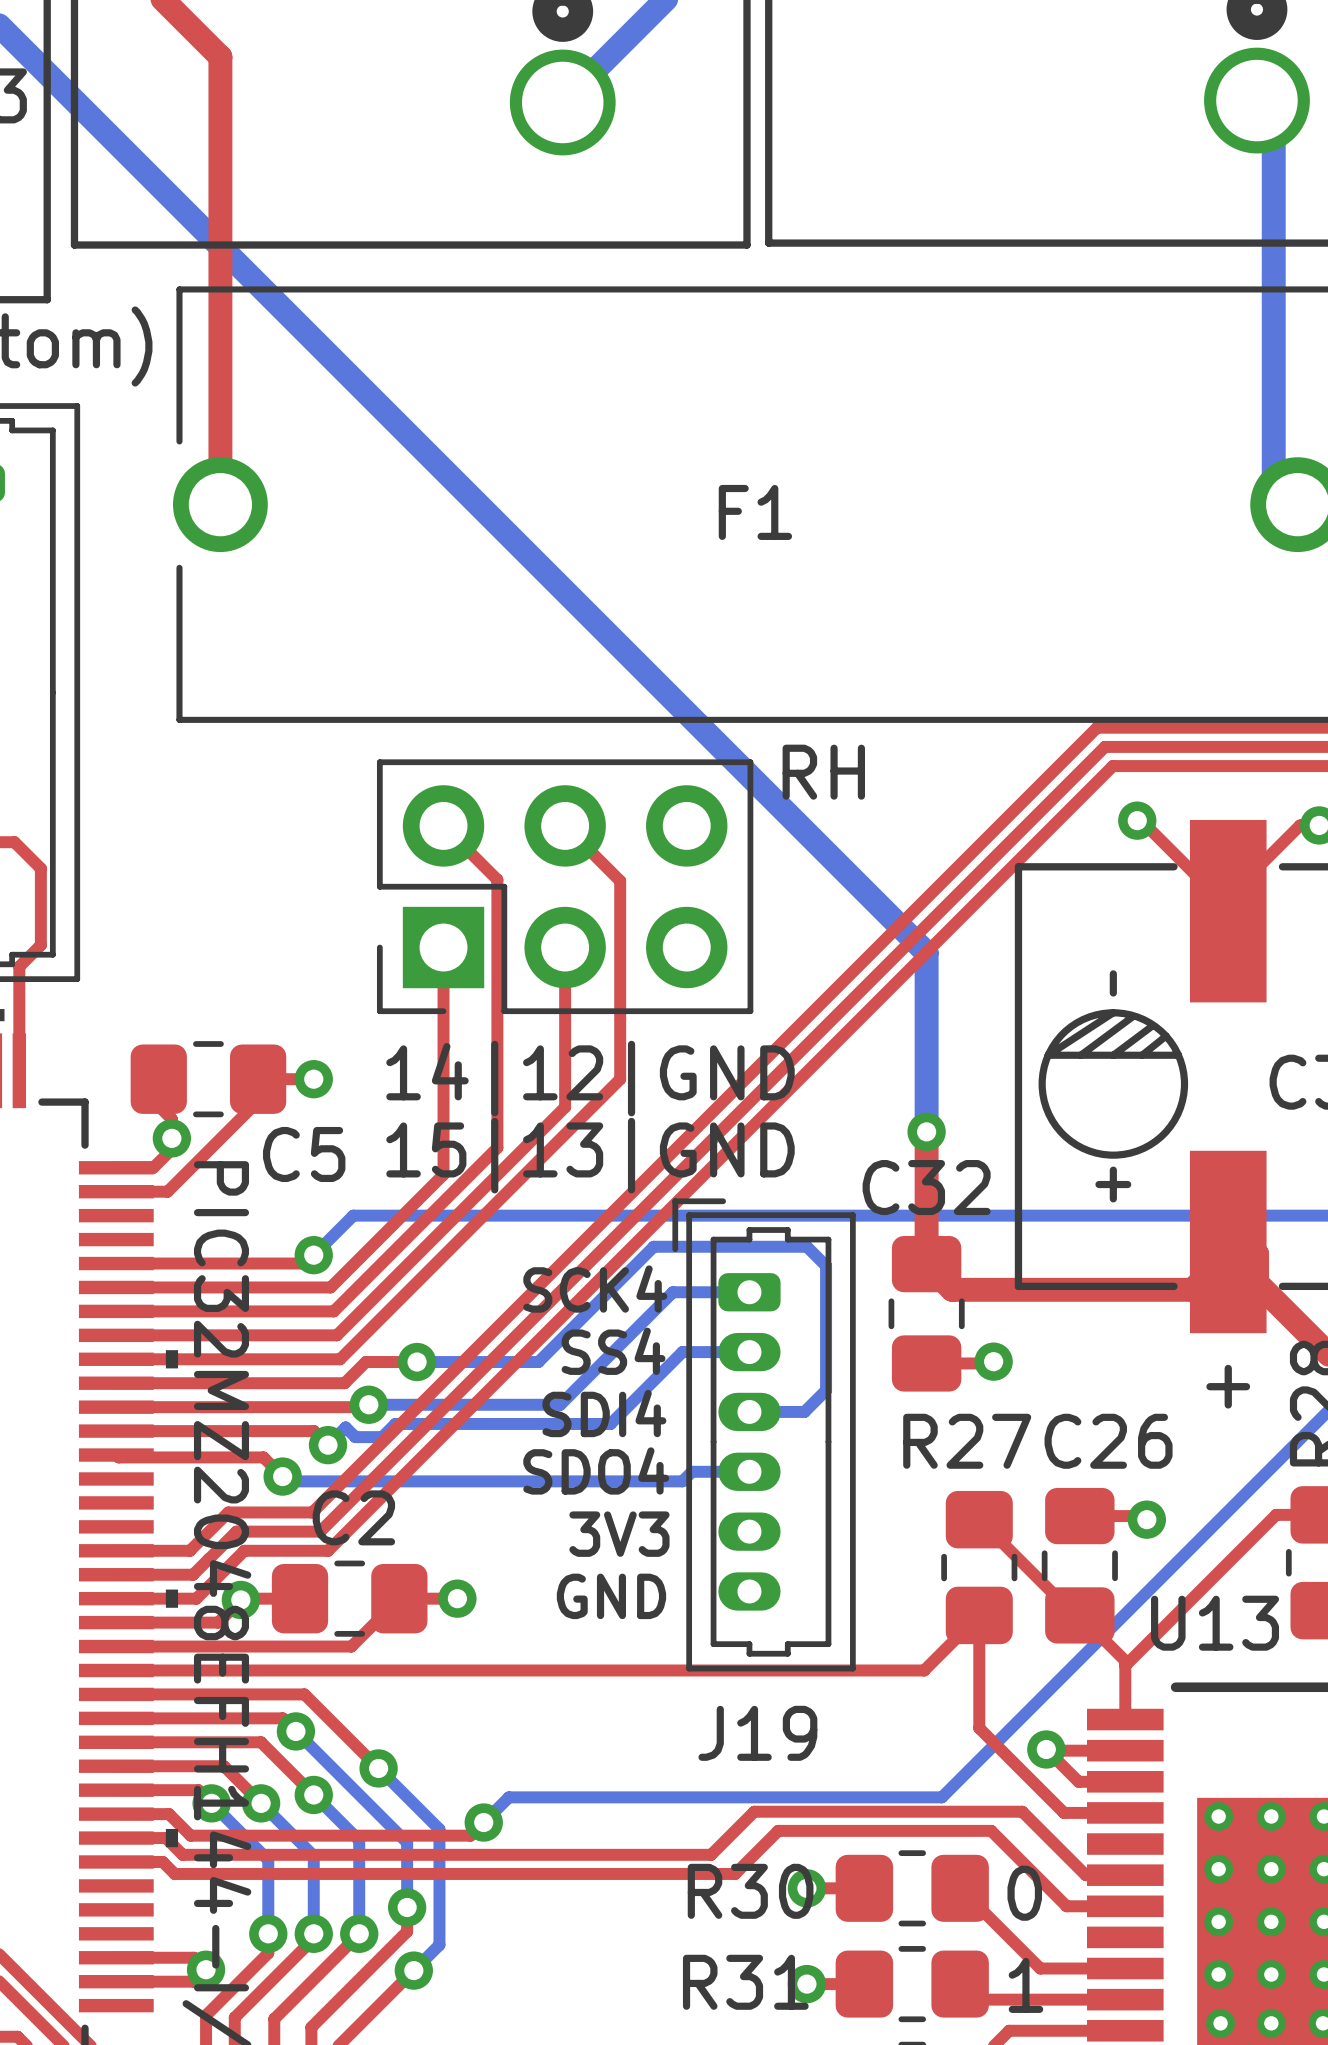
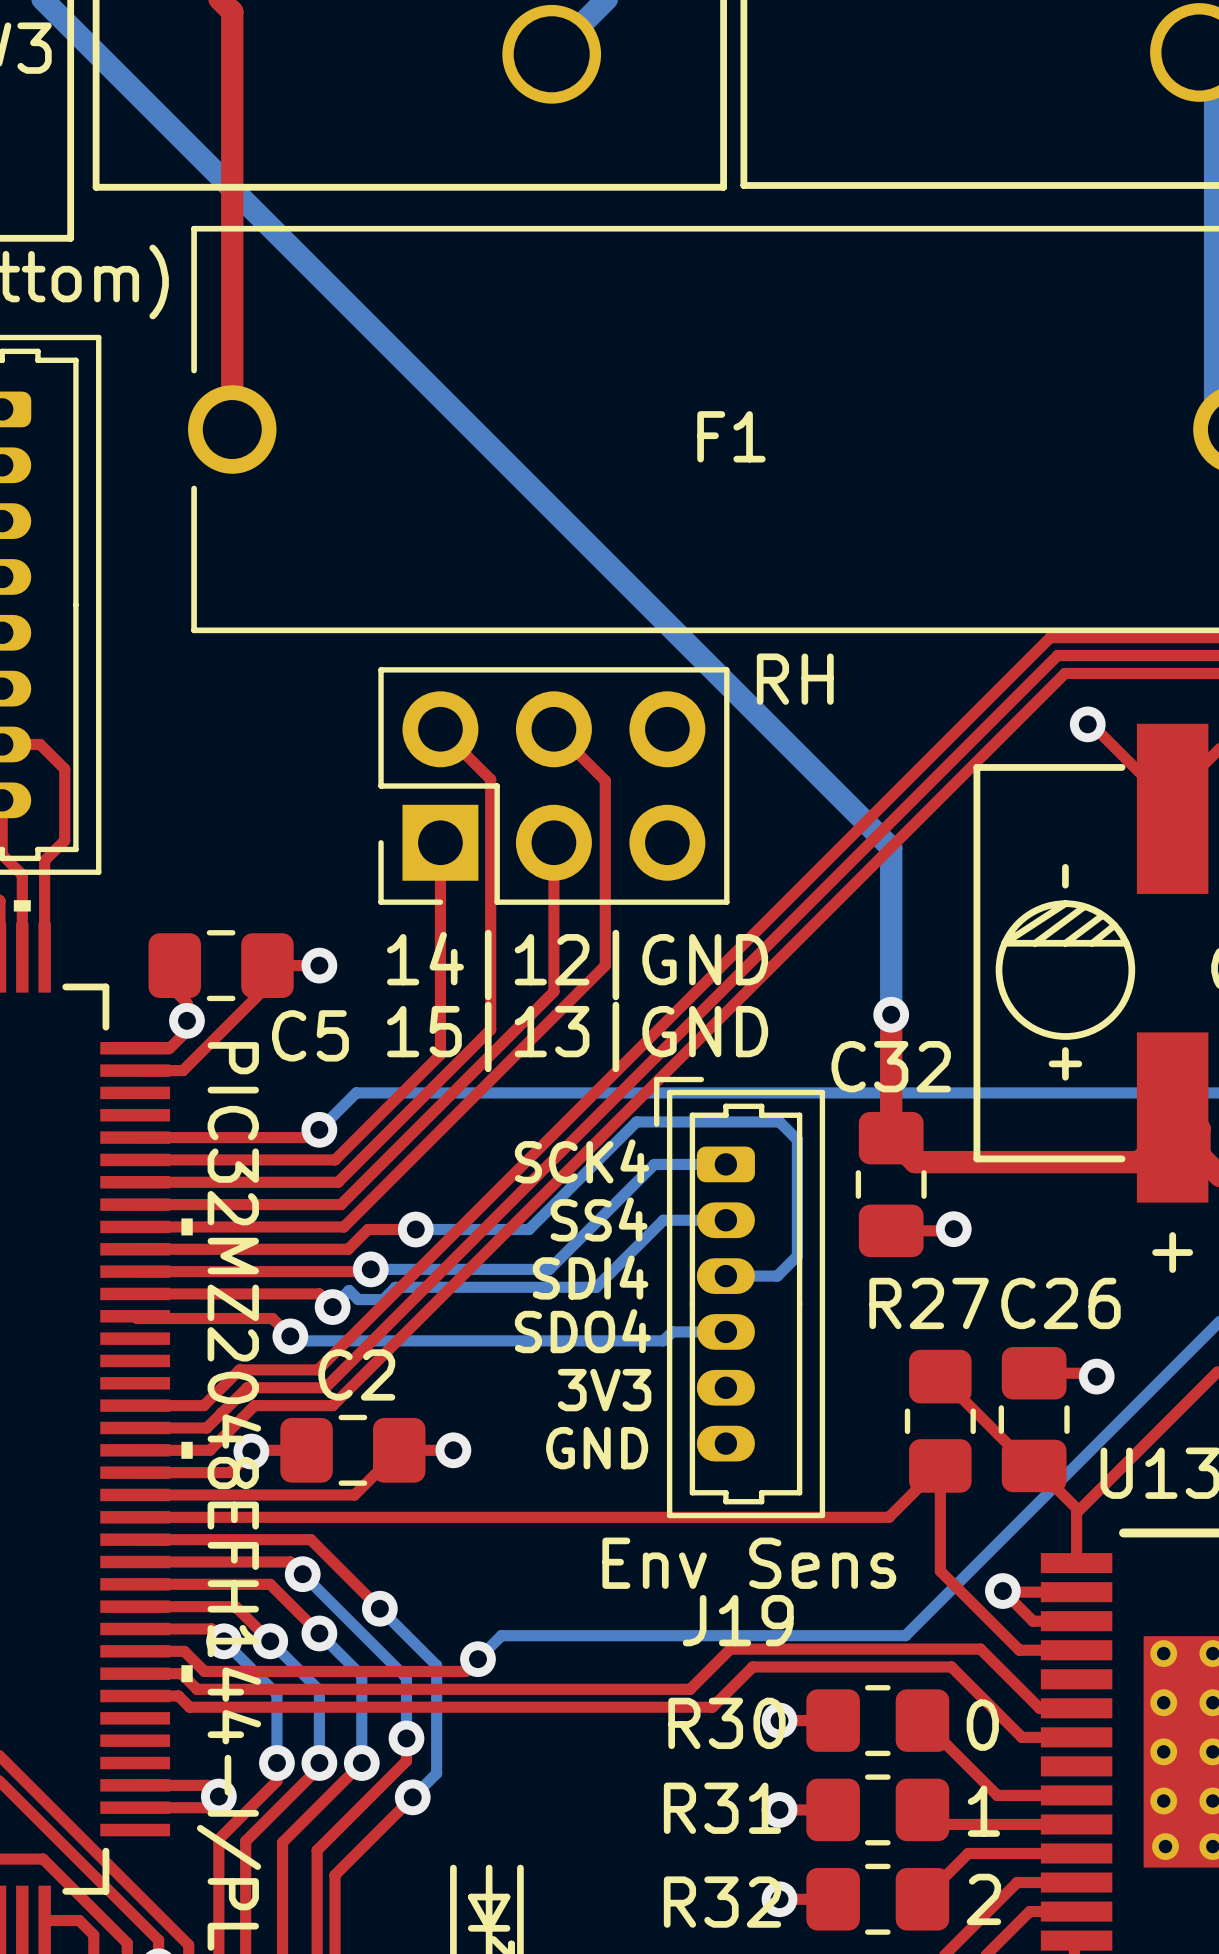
text: none -> Env Sens (749, 1563)
J19 name position: J19 (757, 1733) -> J19 (738, 1620)

